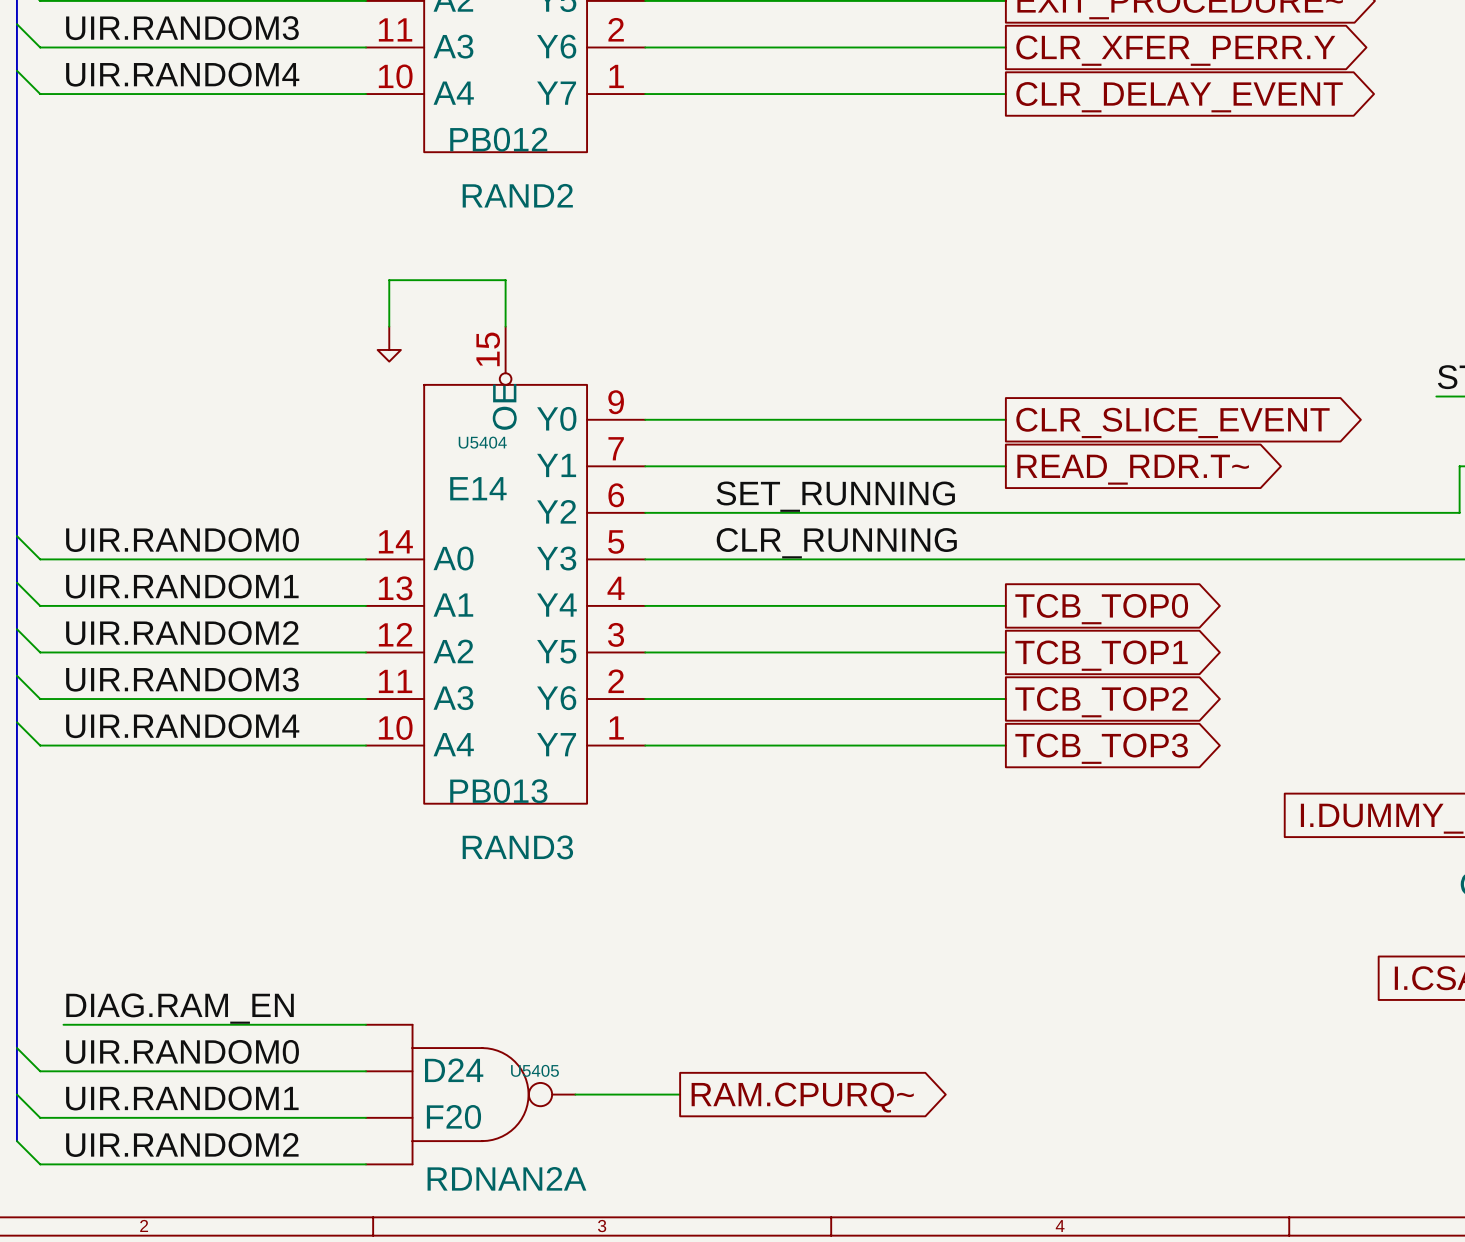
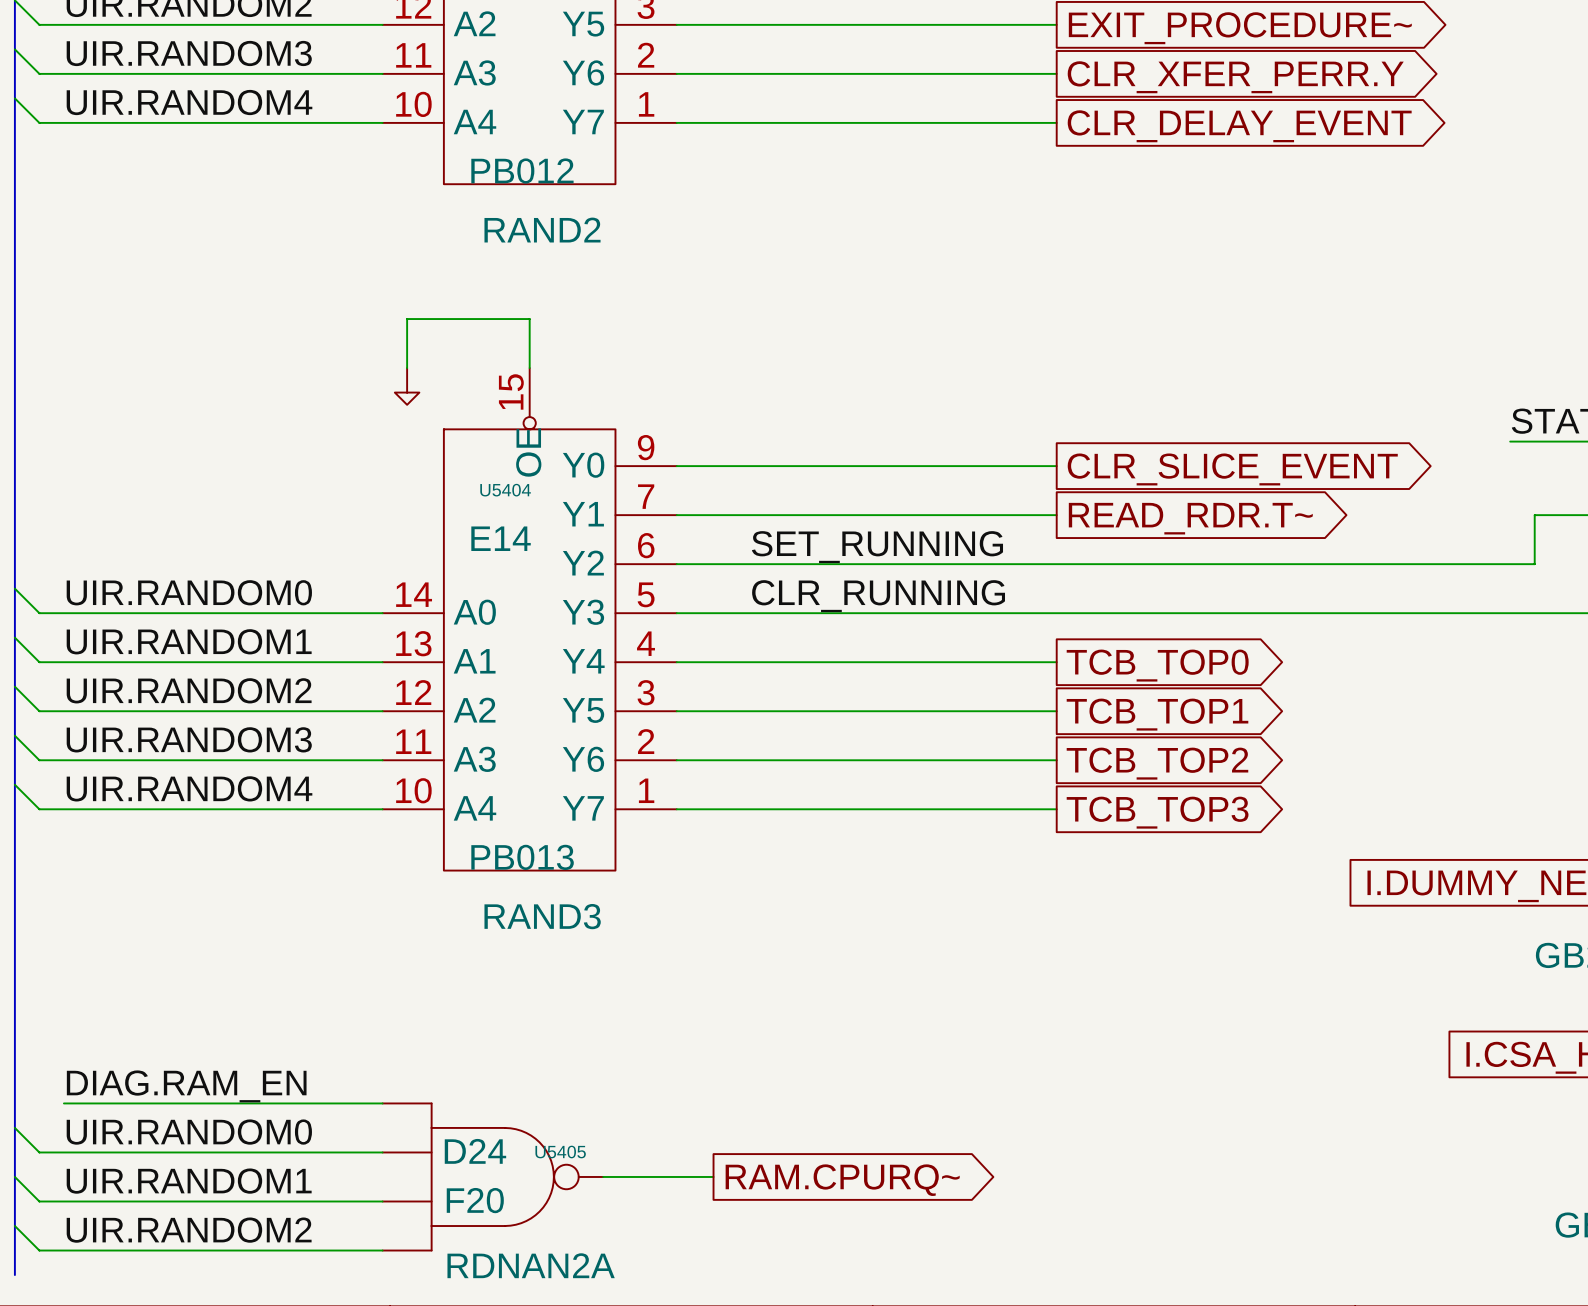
bus: none -> (14, 1226) (14, 1275)

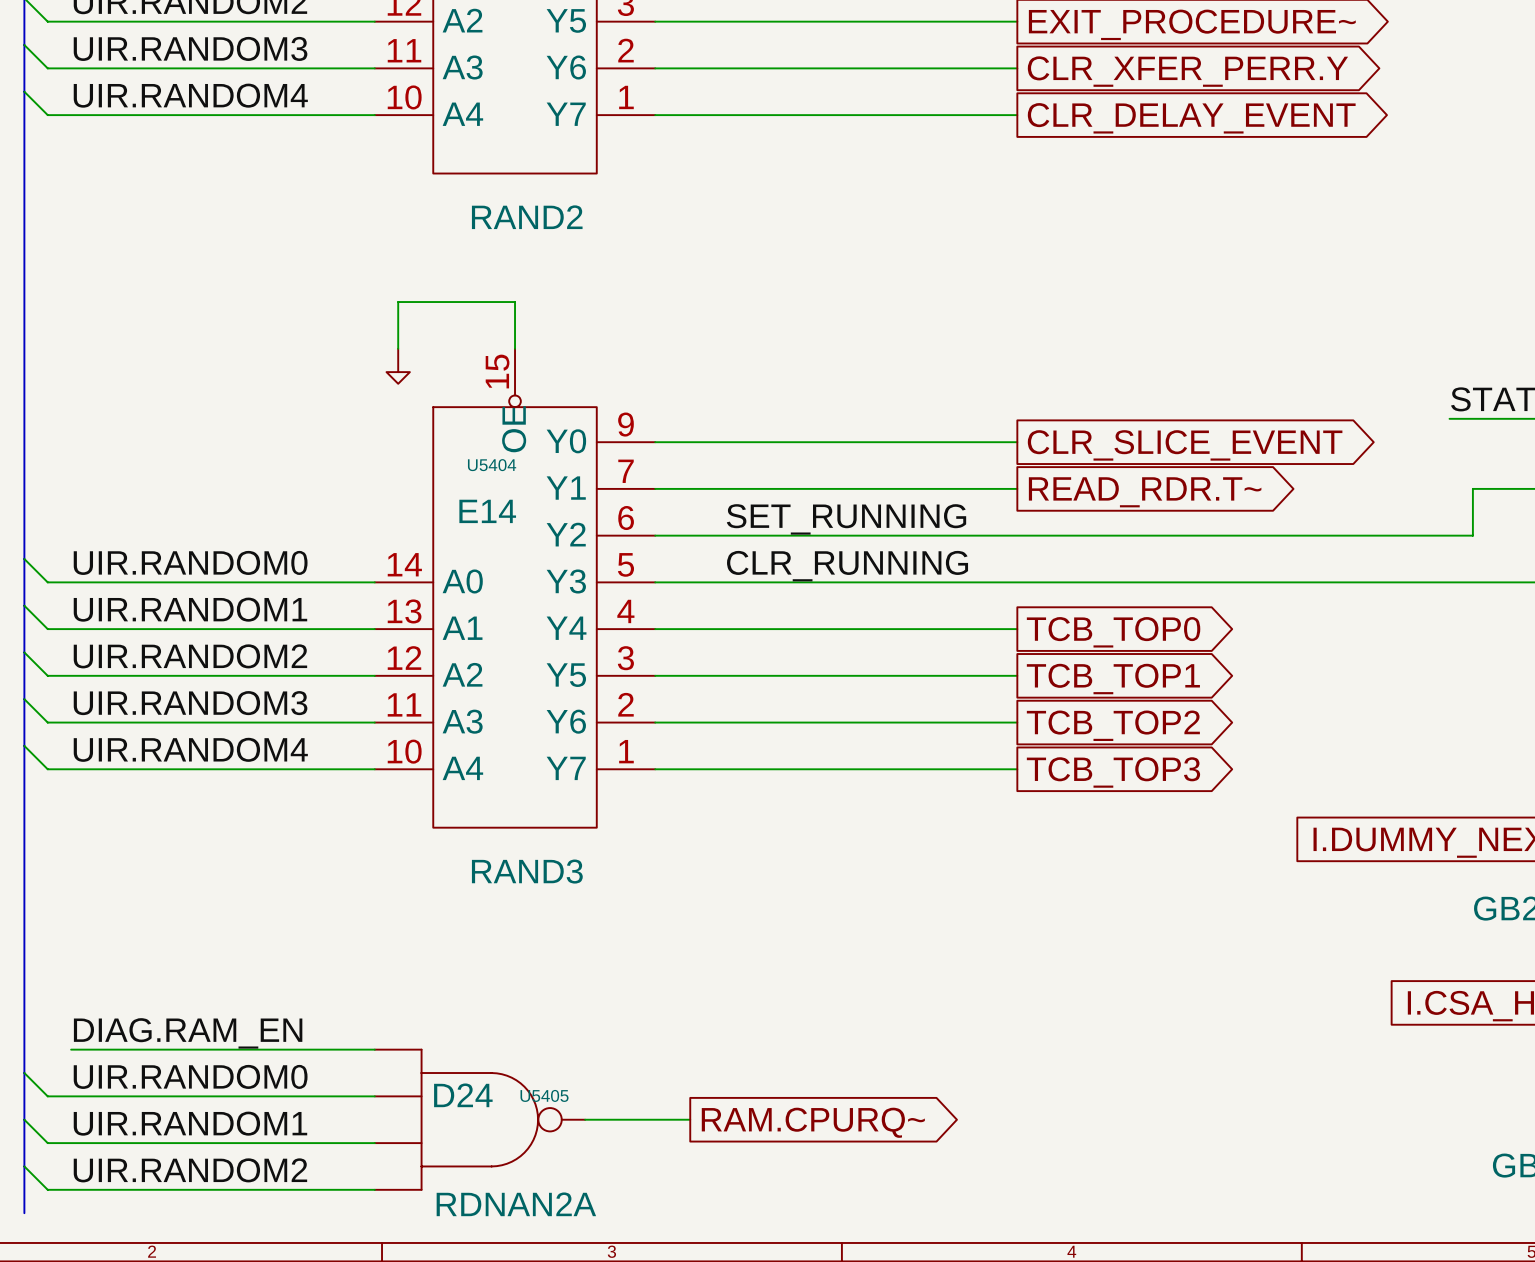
part value: PB012 (522, 171) -> none
U5404 value: PB013 (522, 857) -> none
U5405 value: F20 (475, 1200) -> none

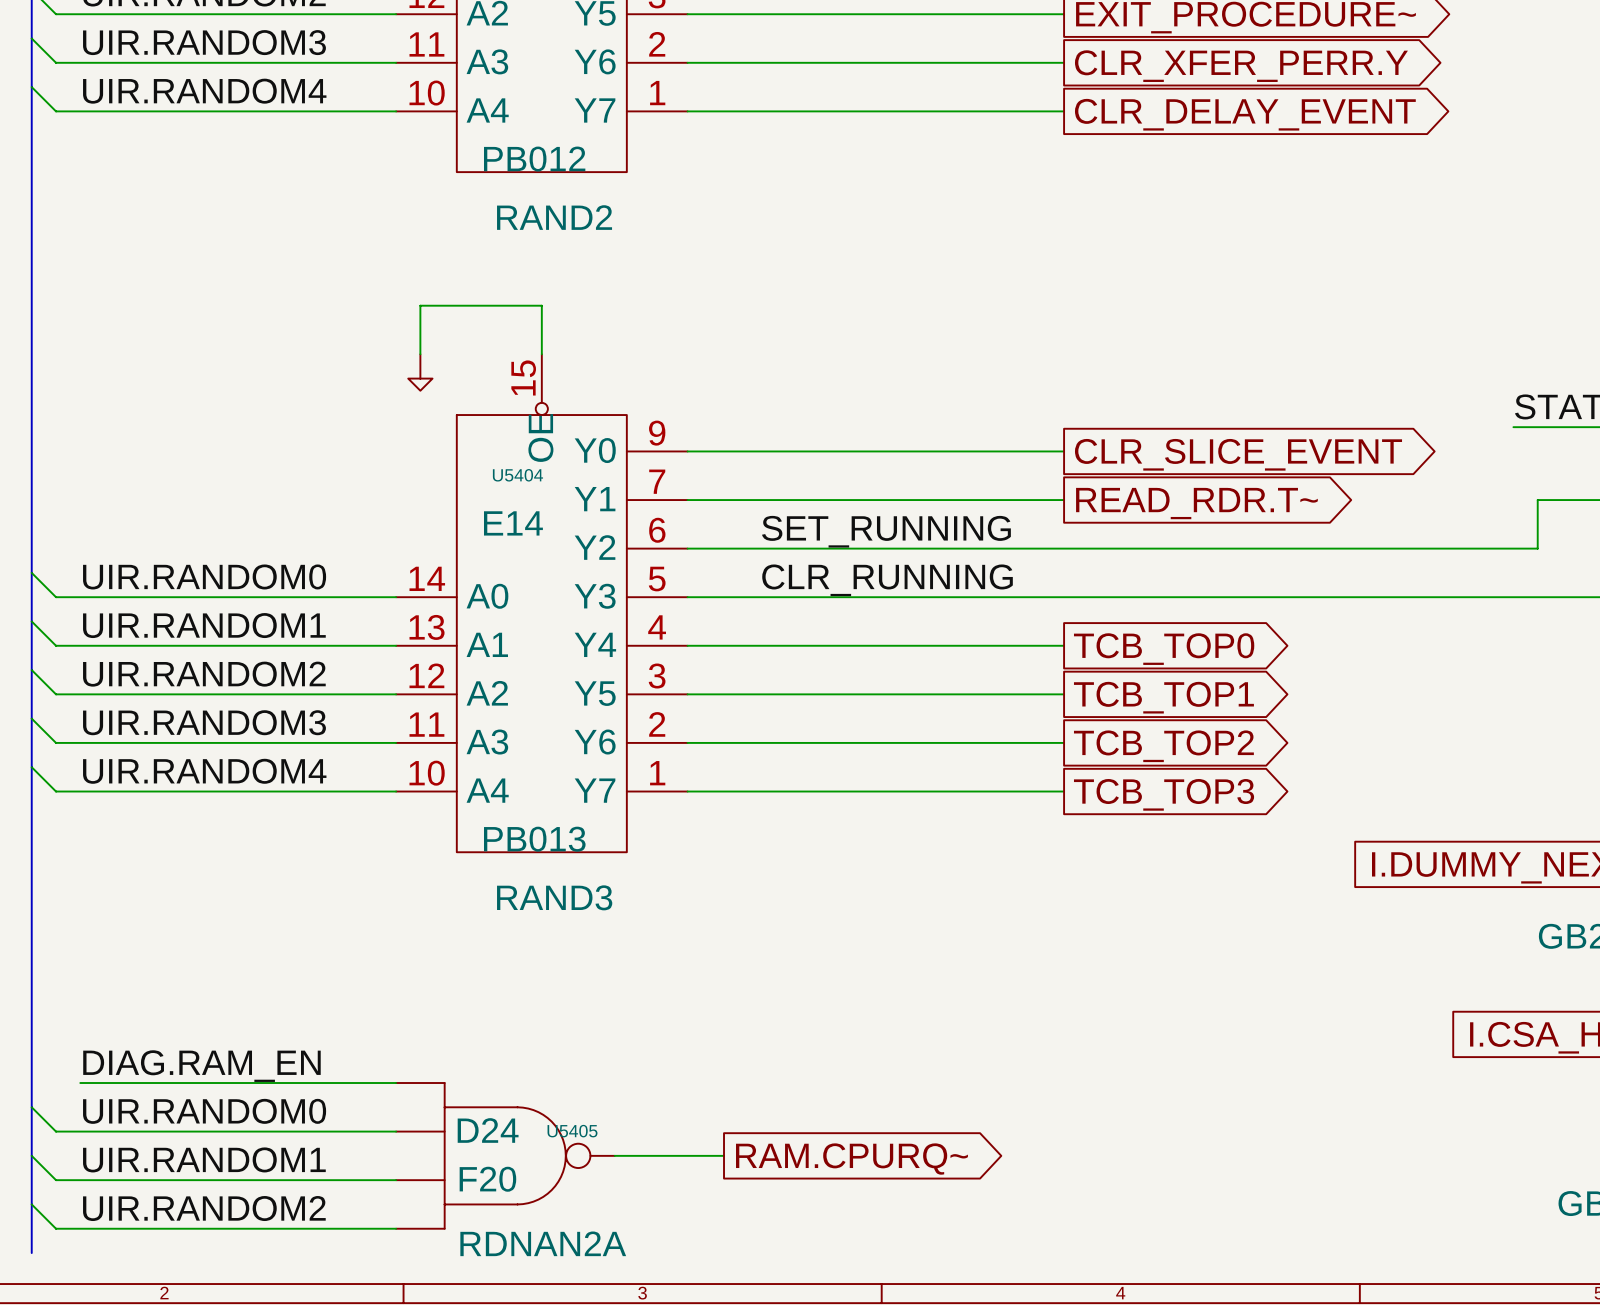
part value: none -> PB012 (534, 159)
U5404 value: none -> PB013 (534, 839)
U5405 value: none -> F20 (487, 1179)

